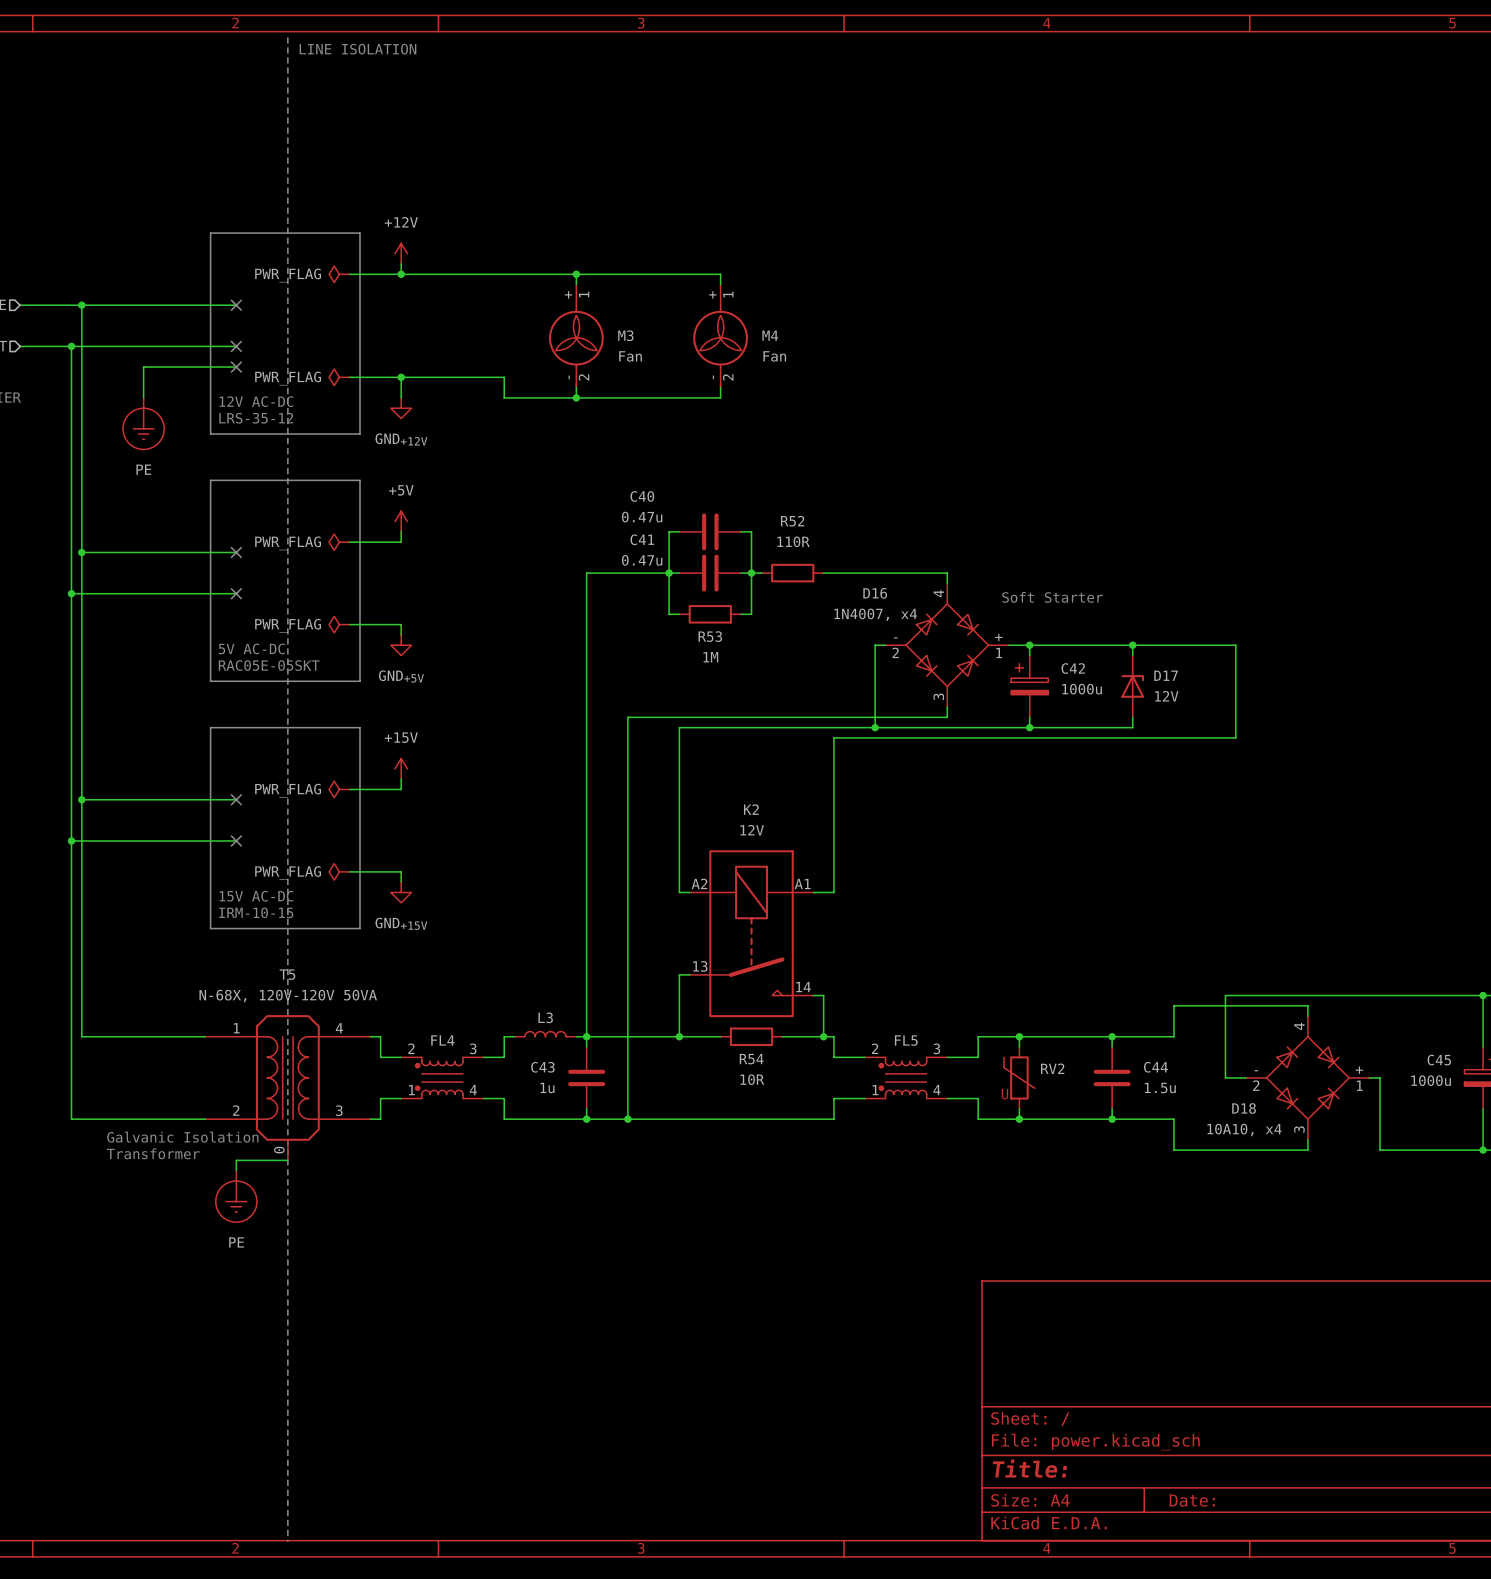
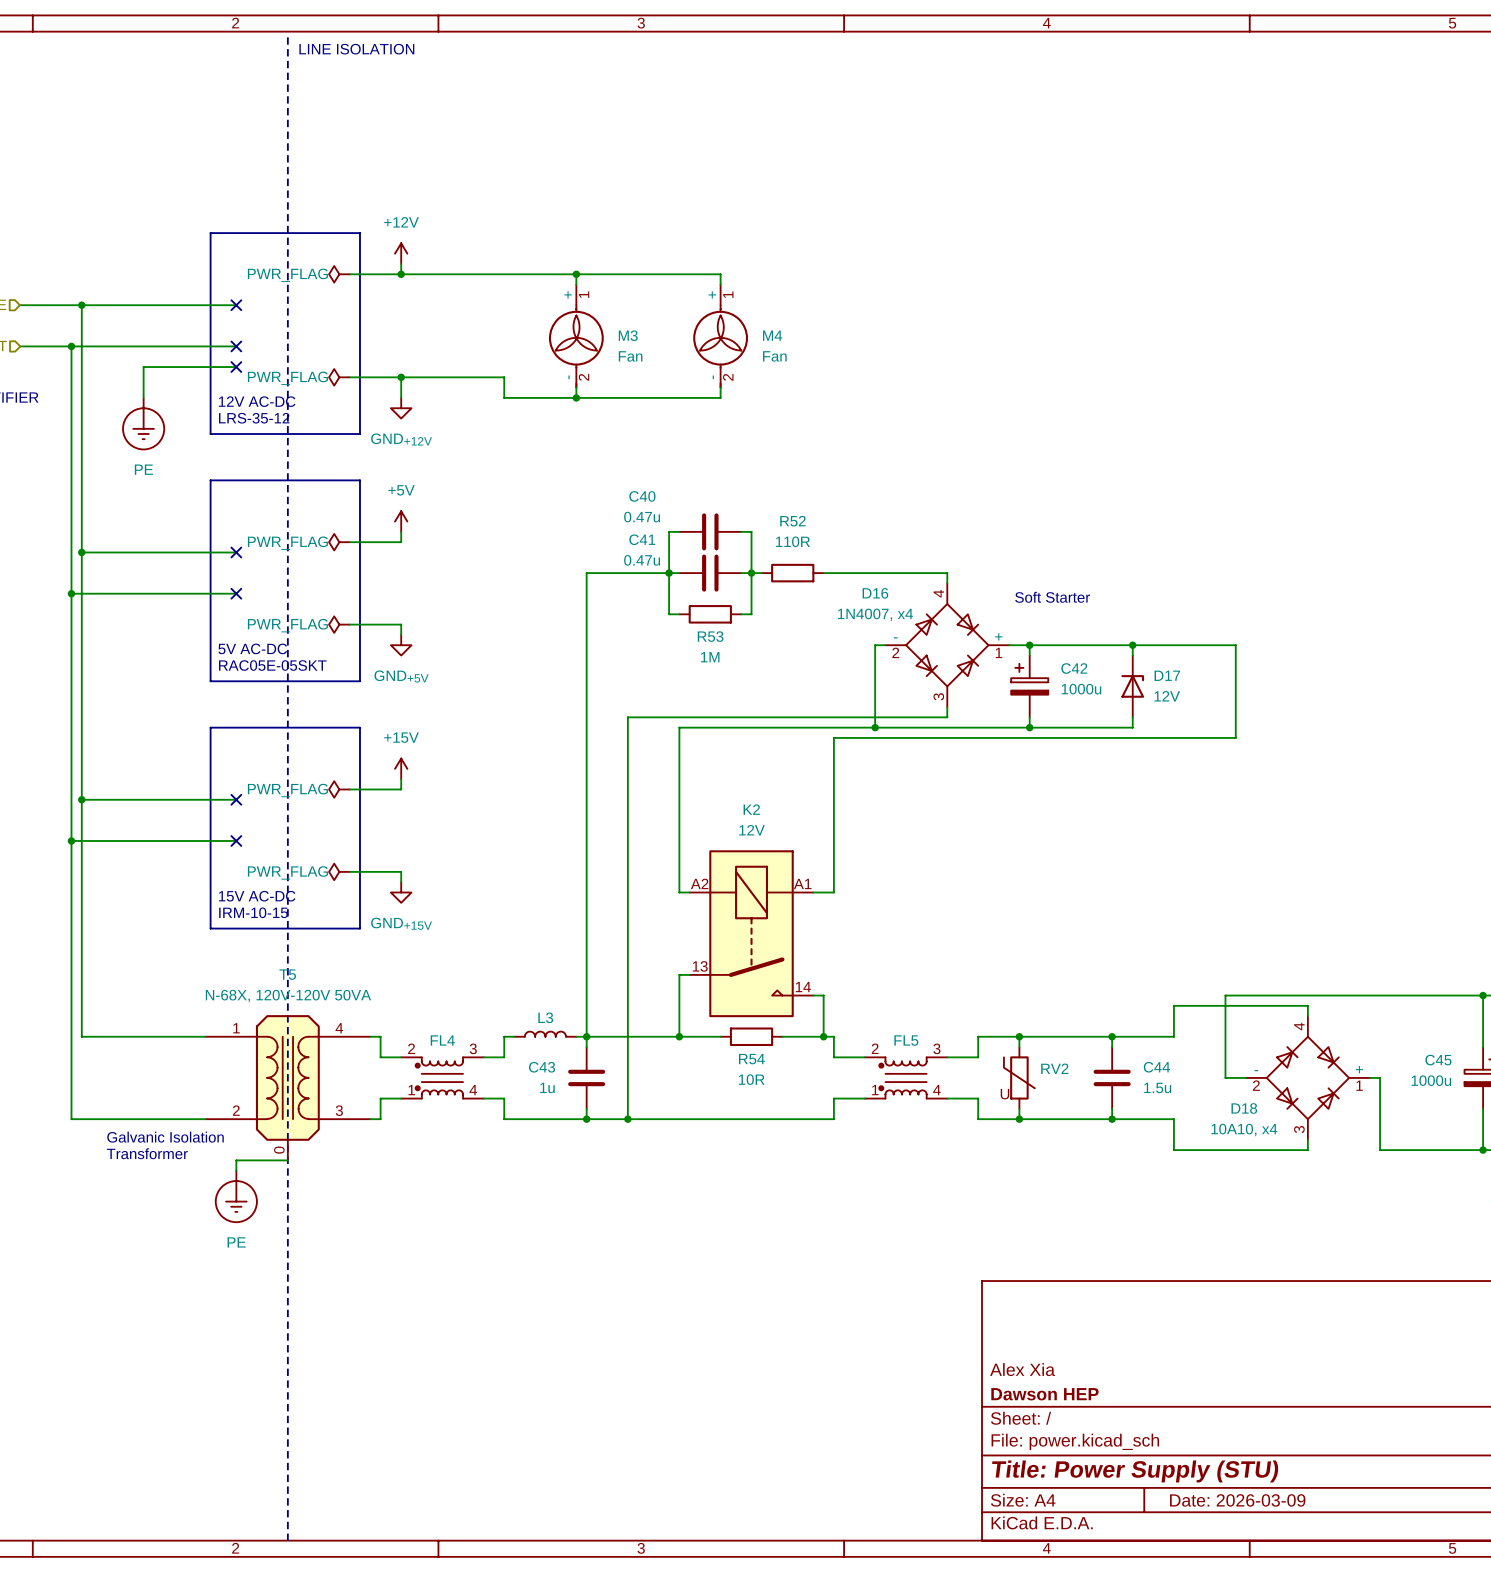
title block: none -> Alex Xia (1022, 1369)
title block: none -> Dawson HEP (1044, 1394)
title block: Title: (1029, 1468) -> Title: Power Supply (STU) (1135, 1471)
title block: Date: (1192, 1500) -> Date: 2026-03-09 (1237, 1500)

